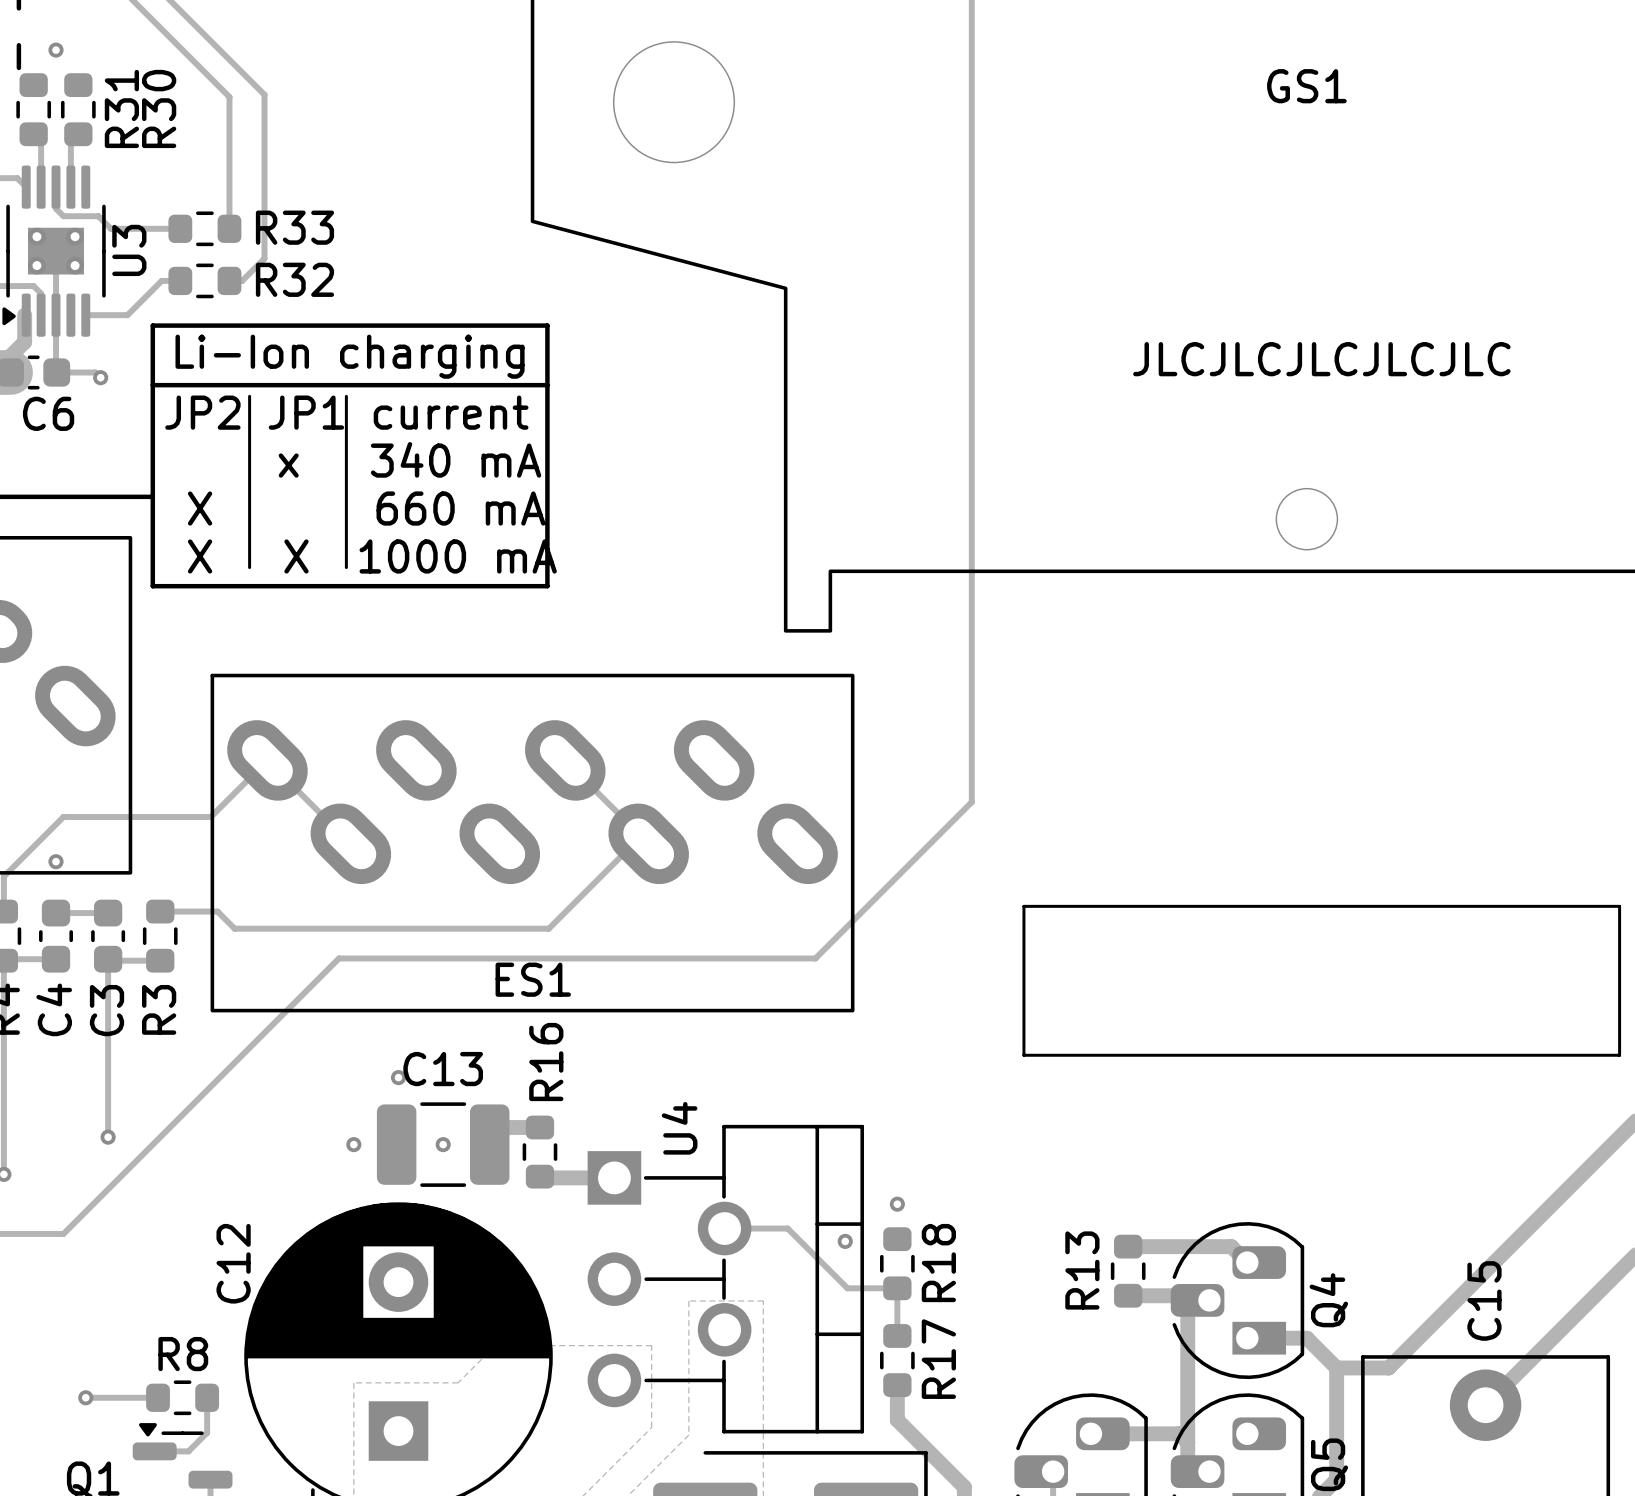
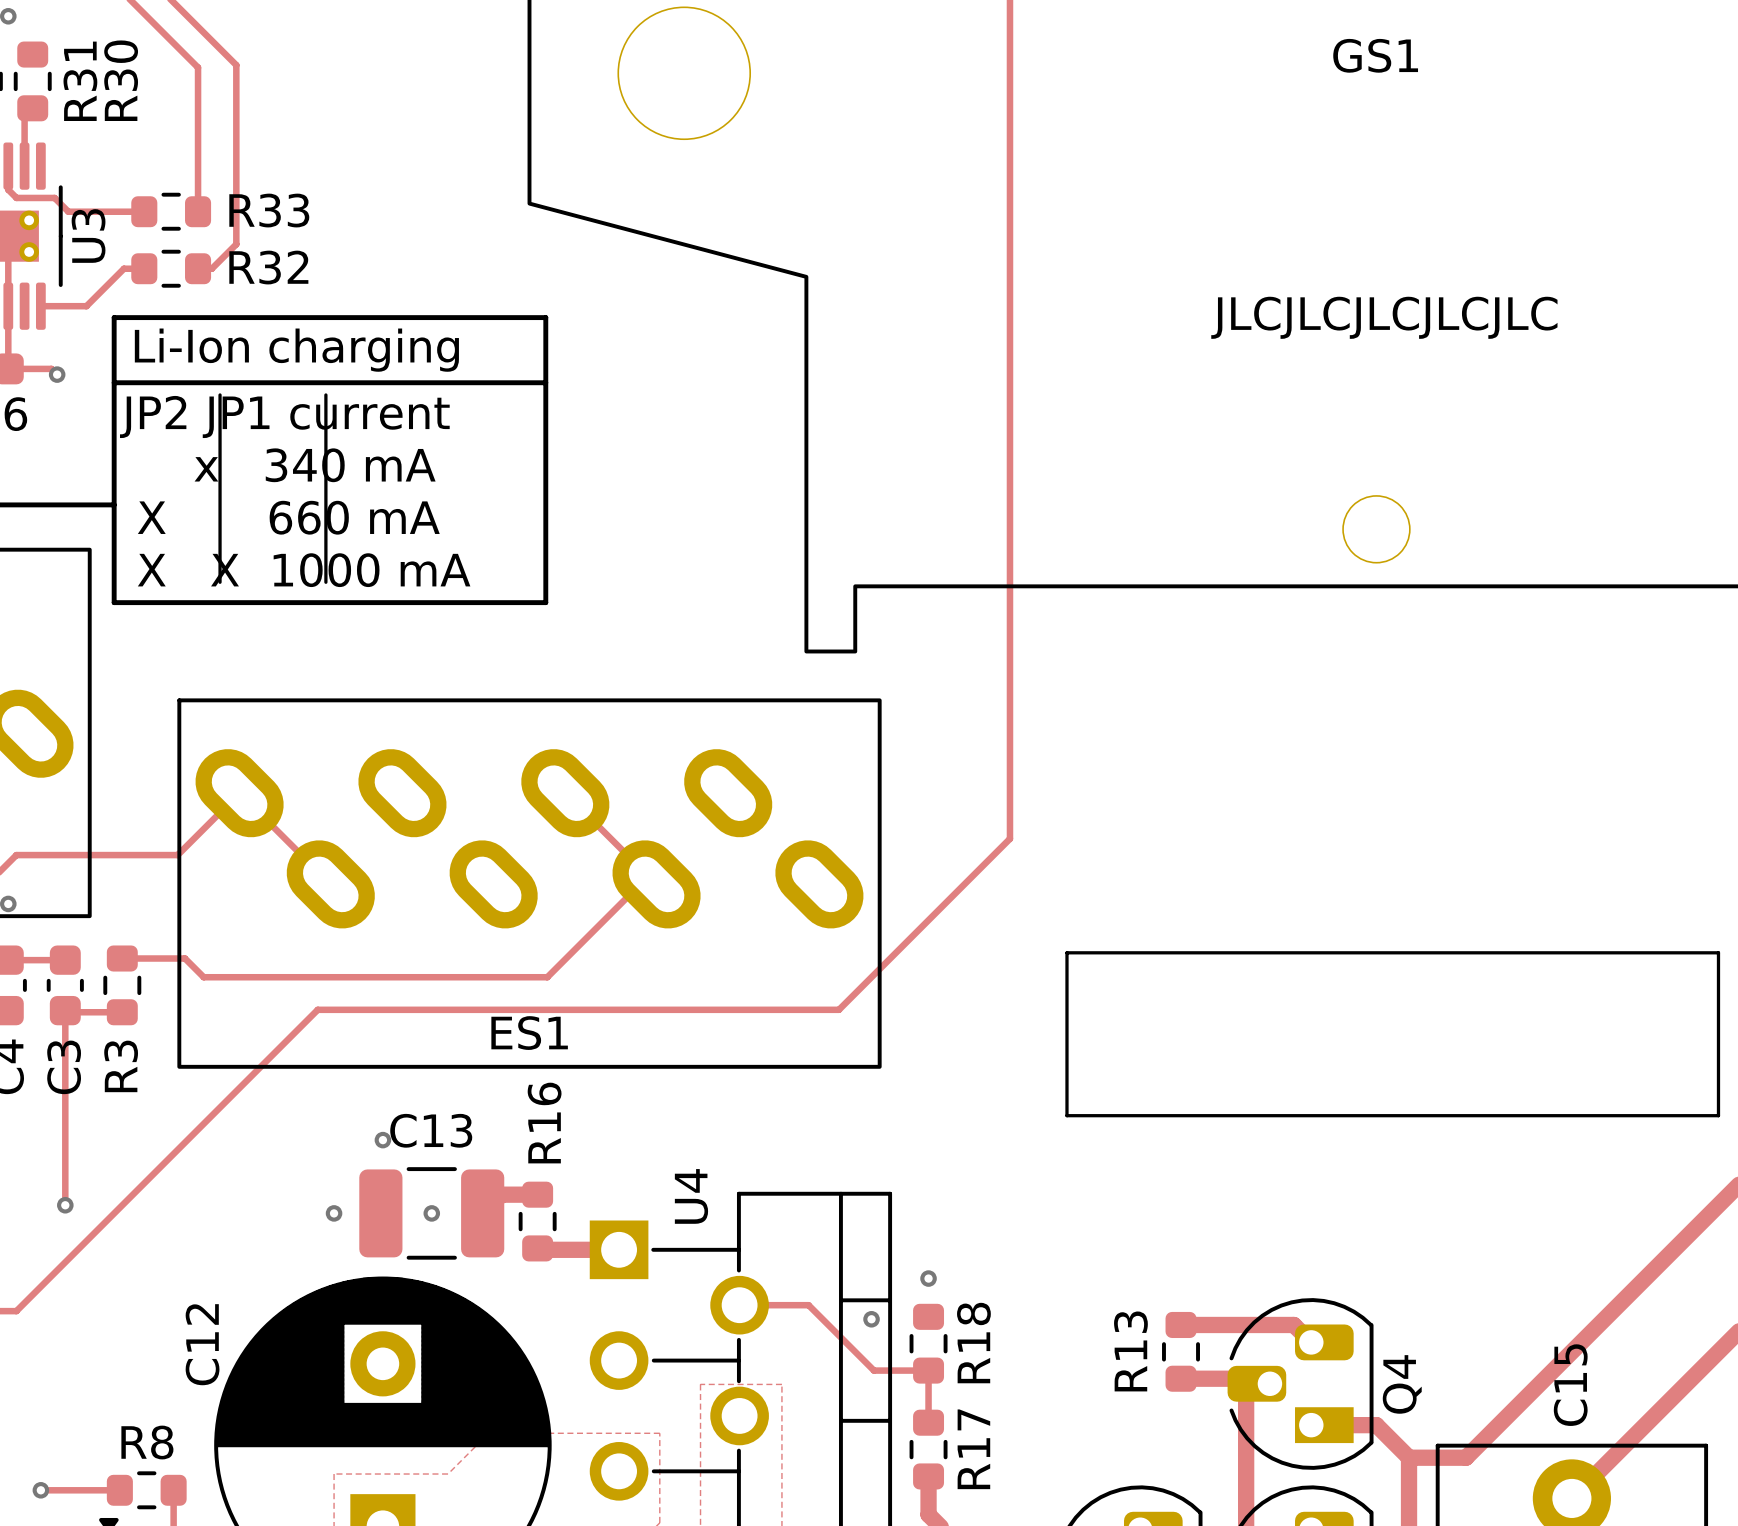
text position: JLCJLCJLCJLCJLC (1321, 359) -> JLCJLCJLCJLCJLC (1384, 317)

